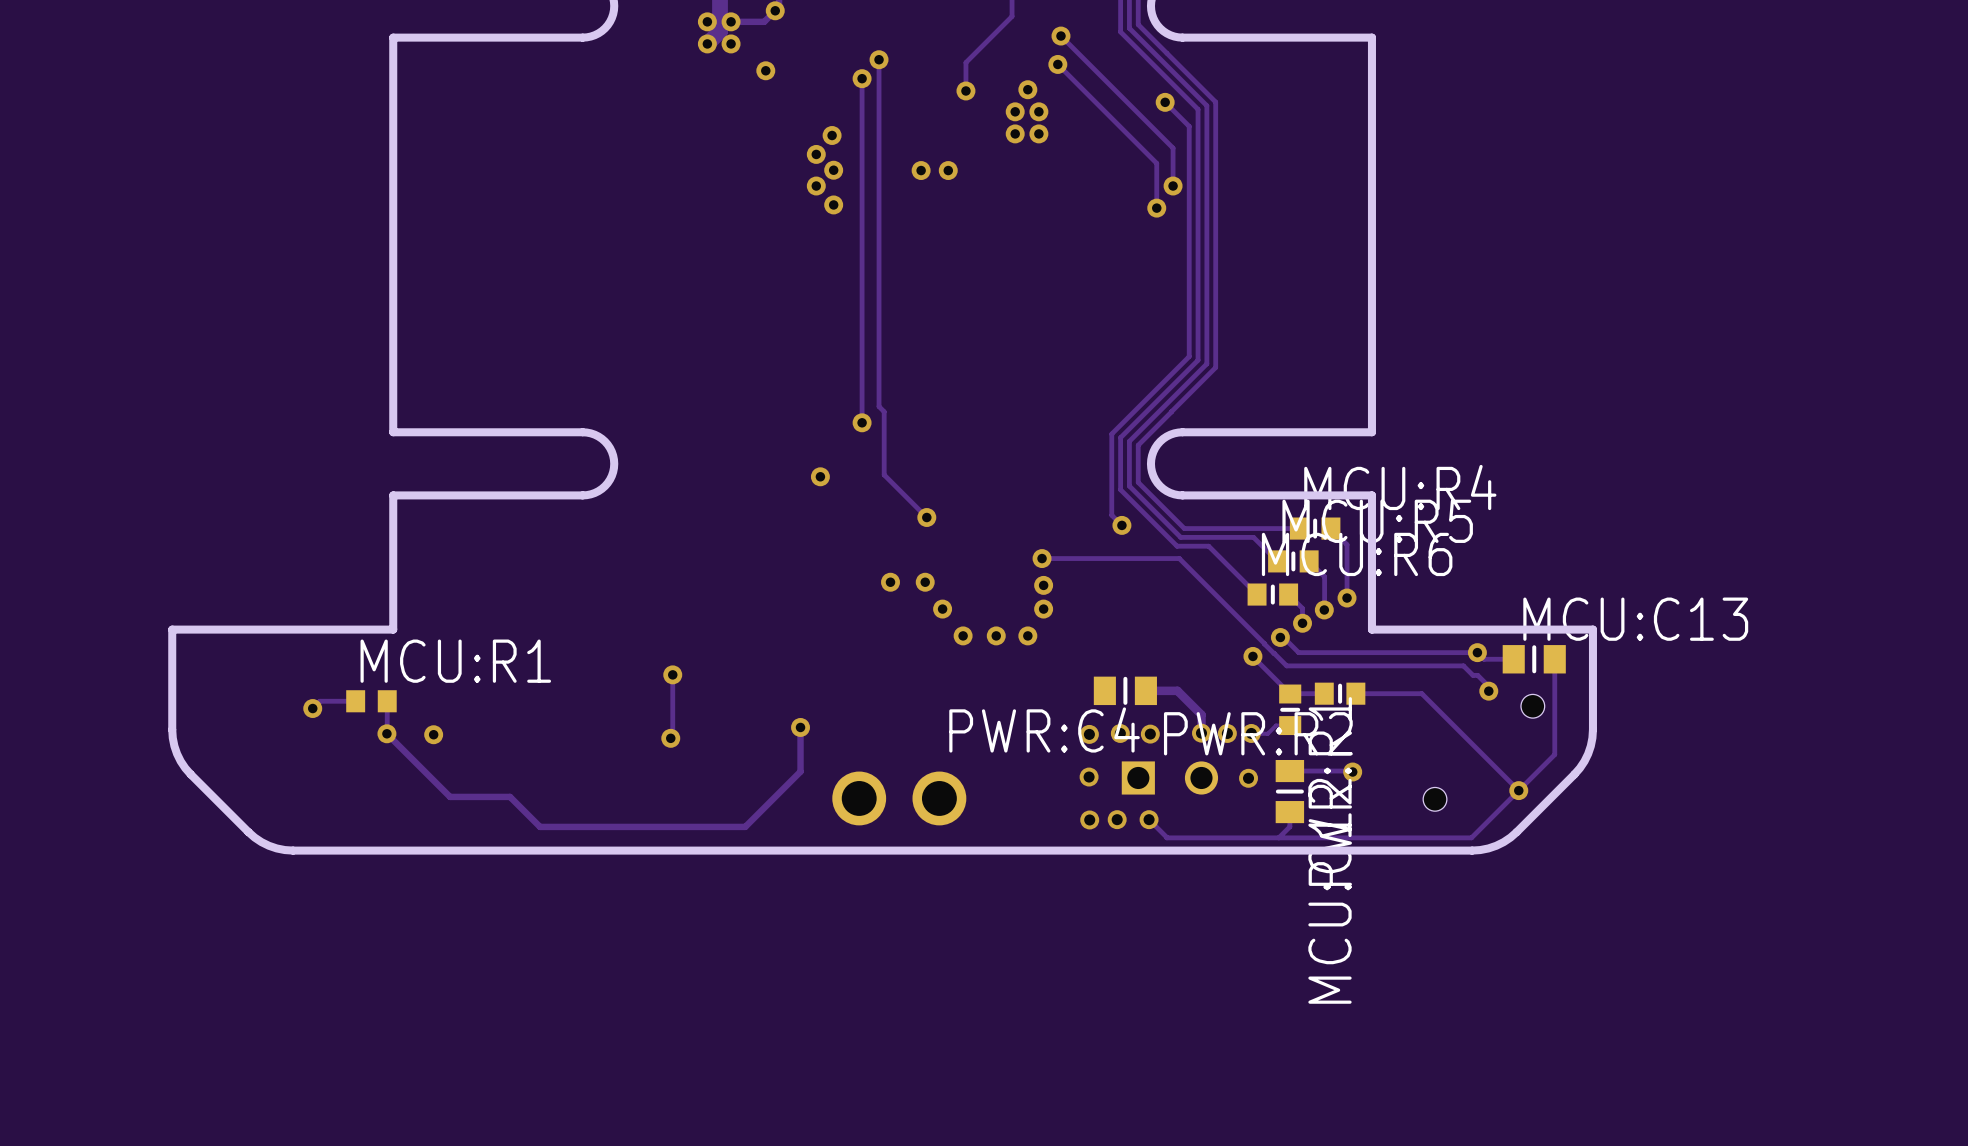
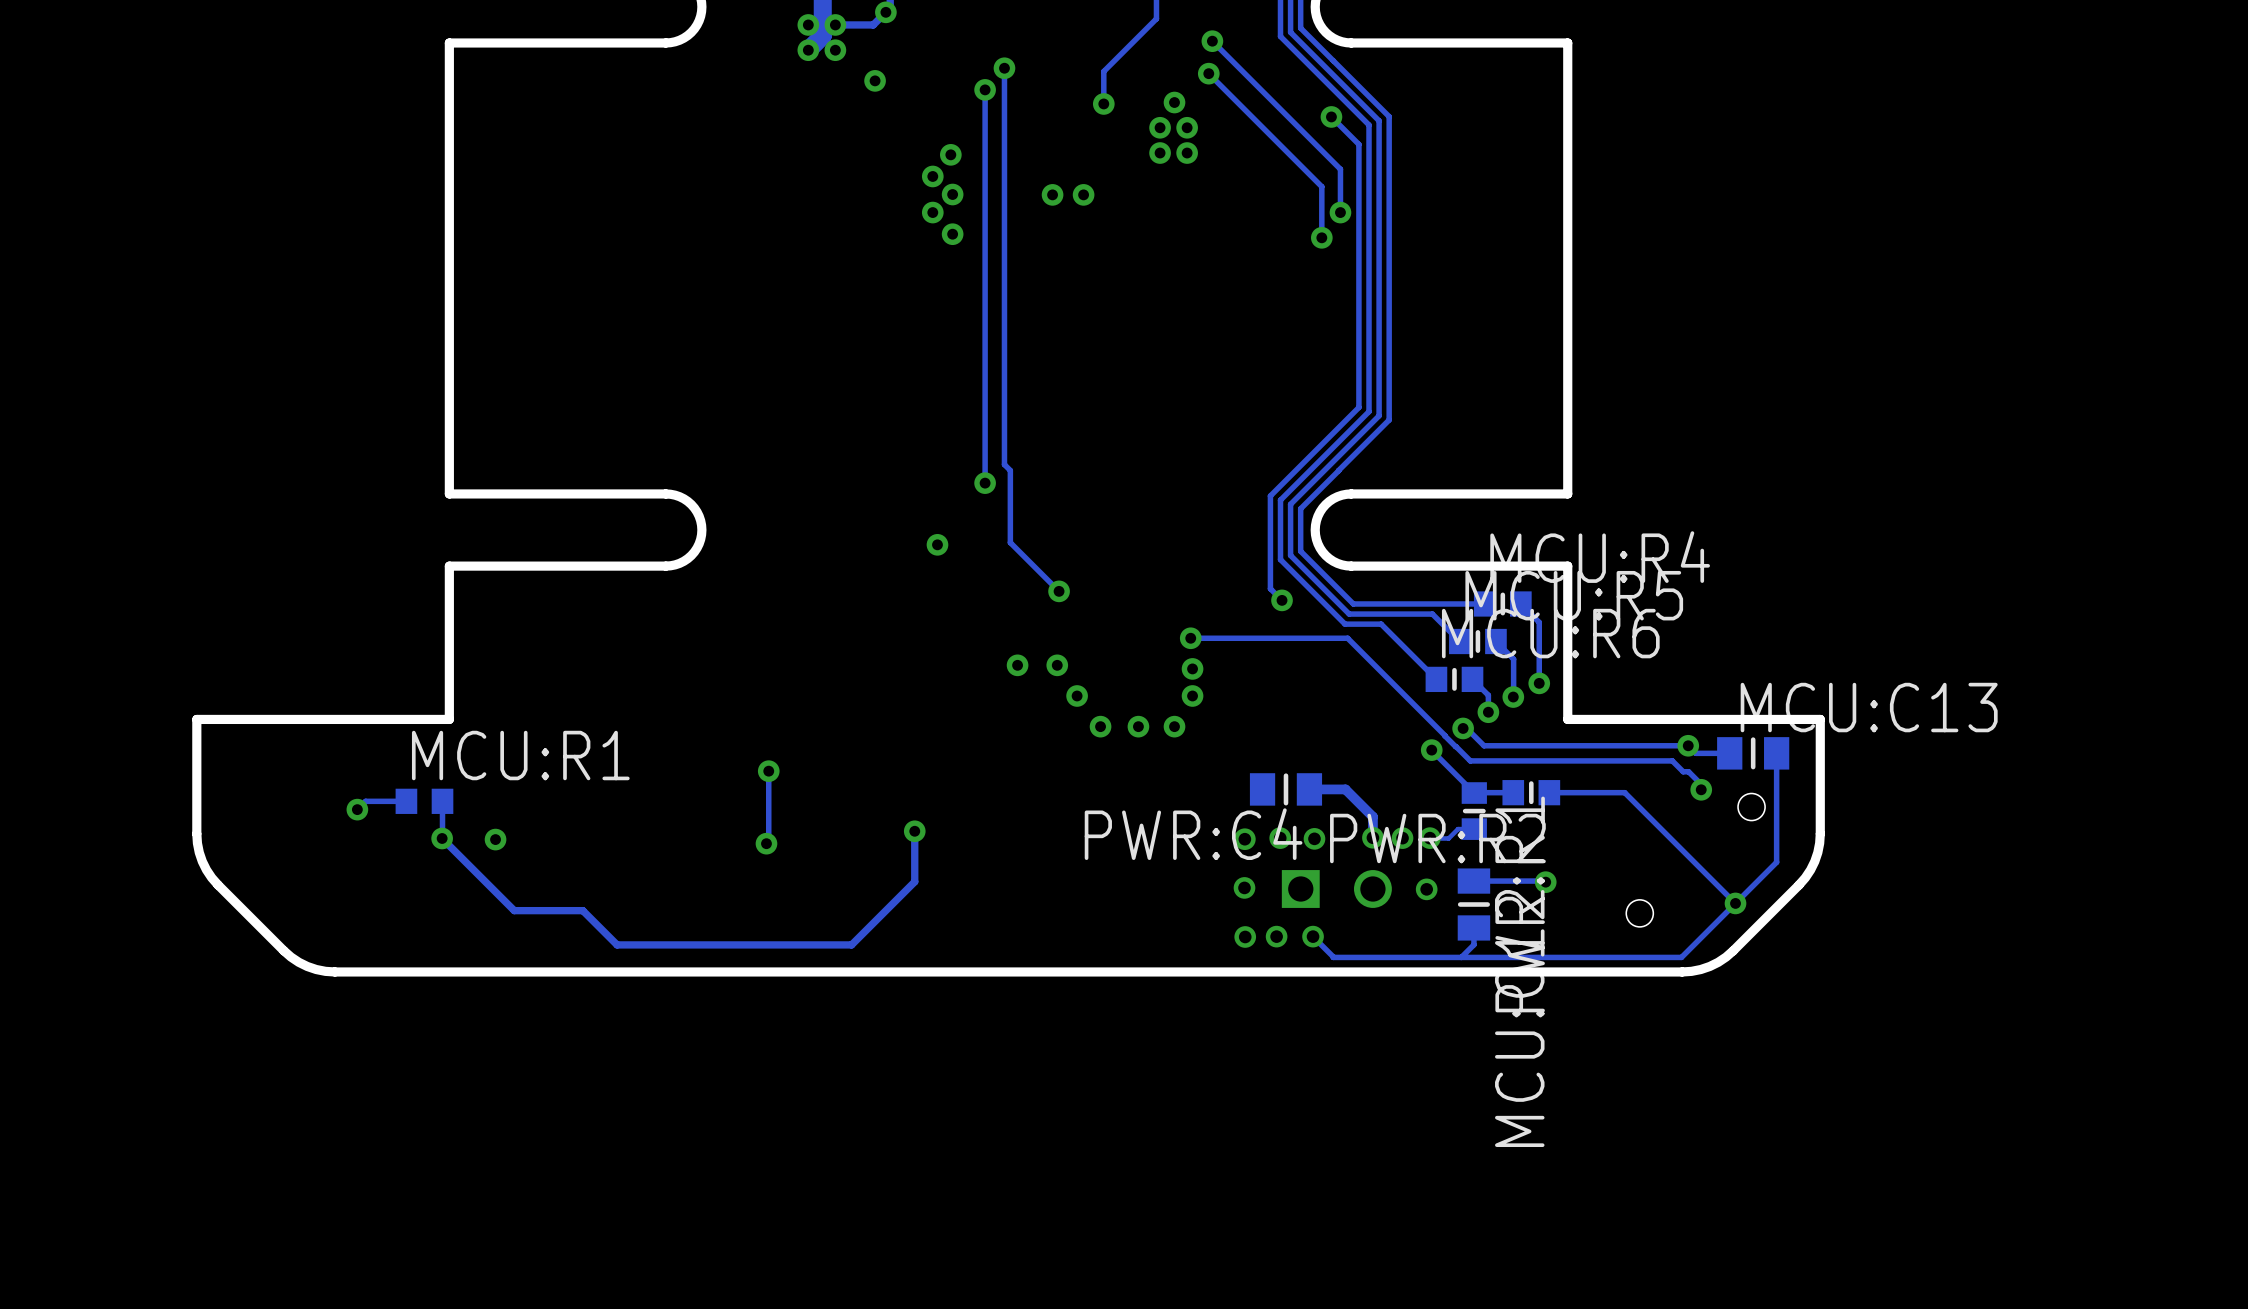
part: (859, 798) -> none
part: (939, 798) -> none

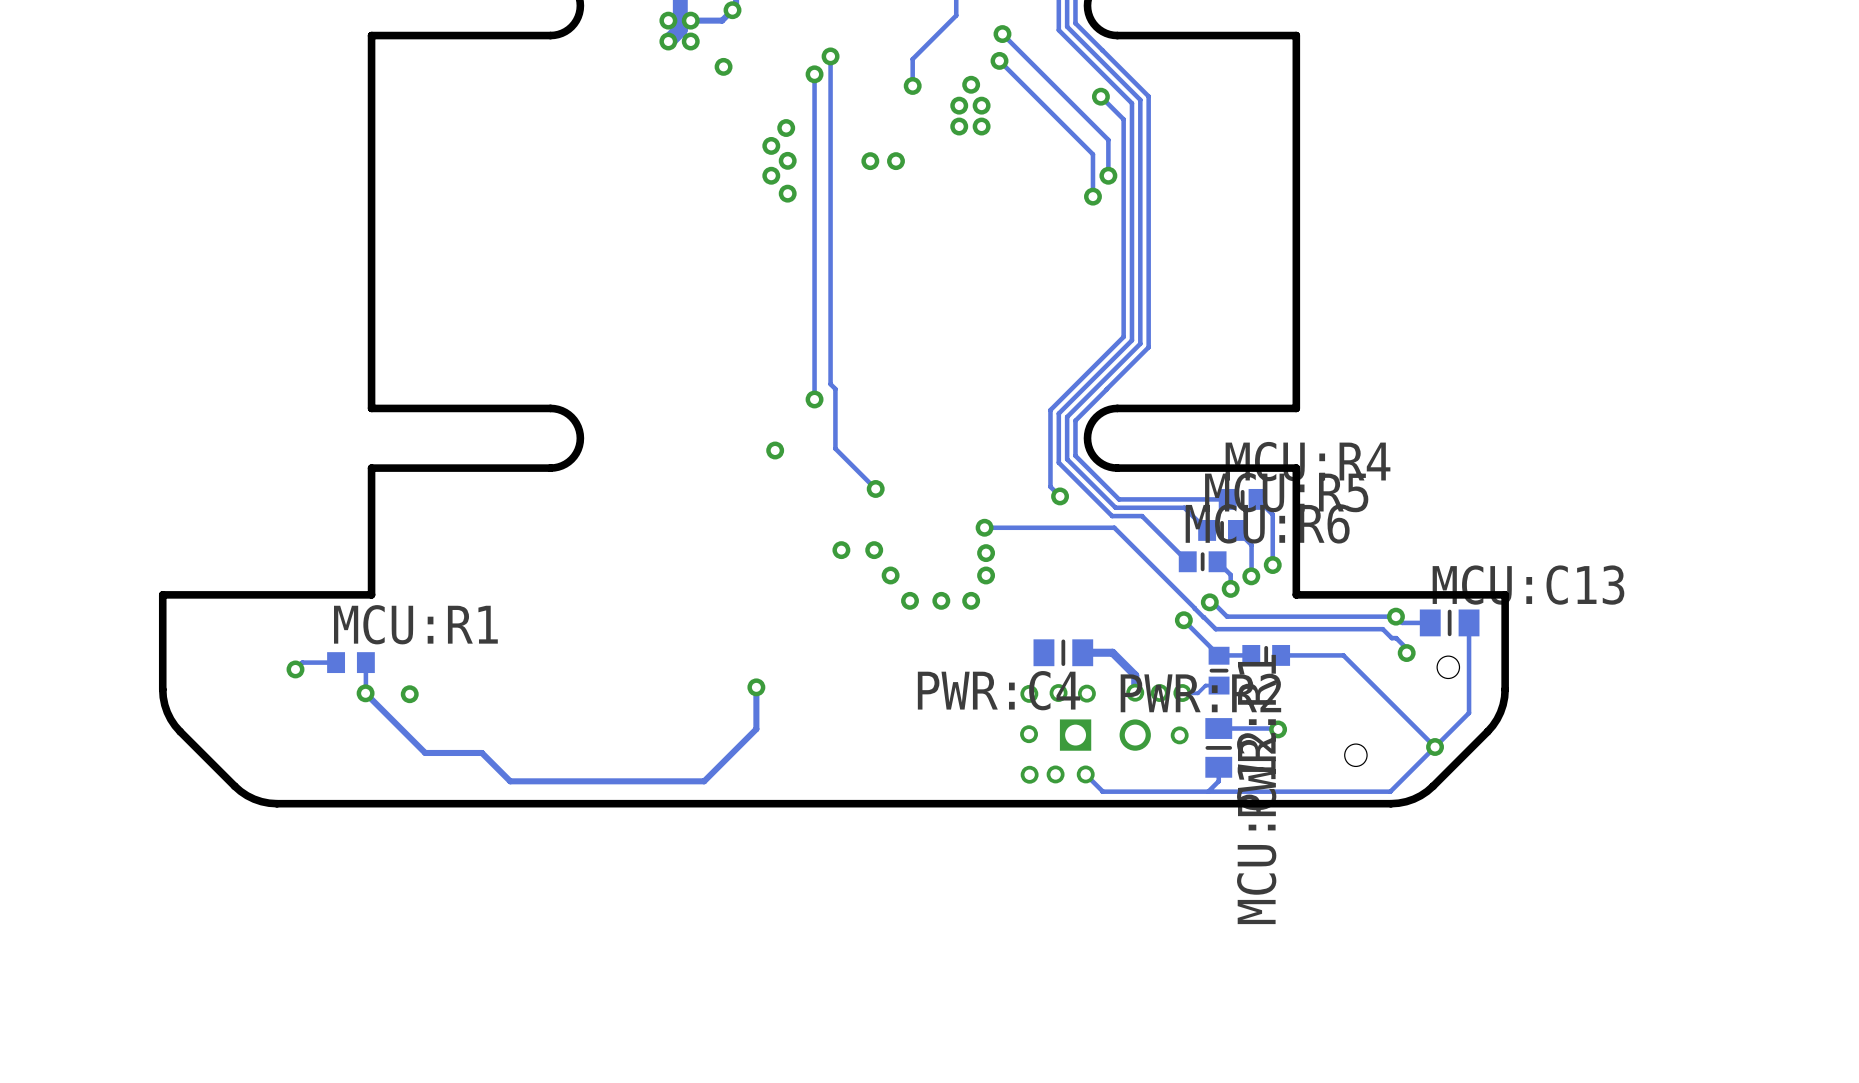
track: (768, 771) (768, 841) (766, 843) -> none
via: (768, 771) -> none
via: (766, 843) -> none

